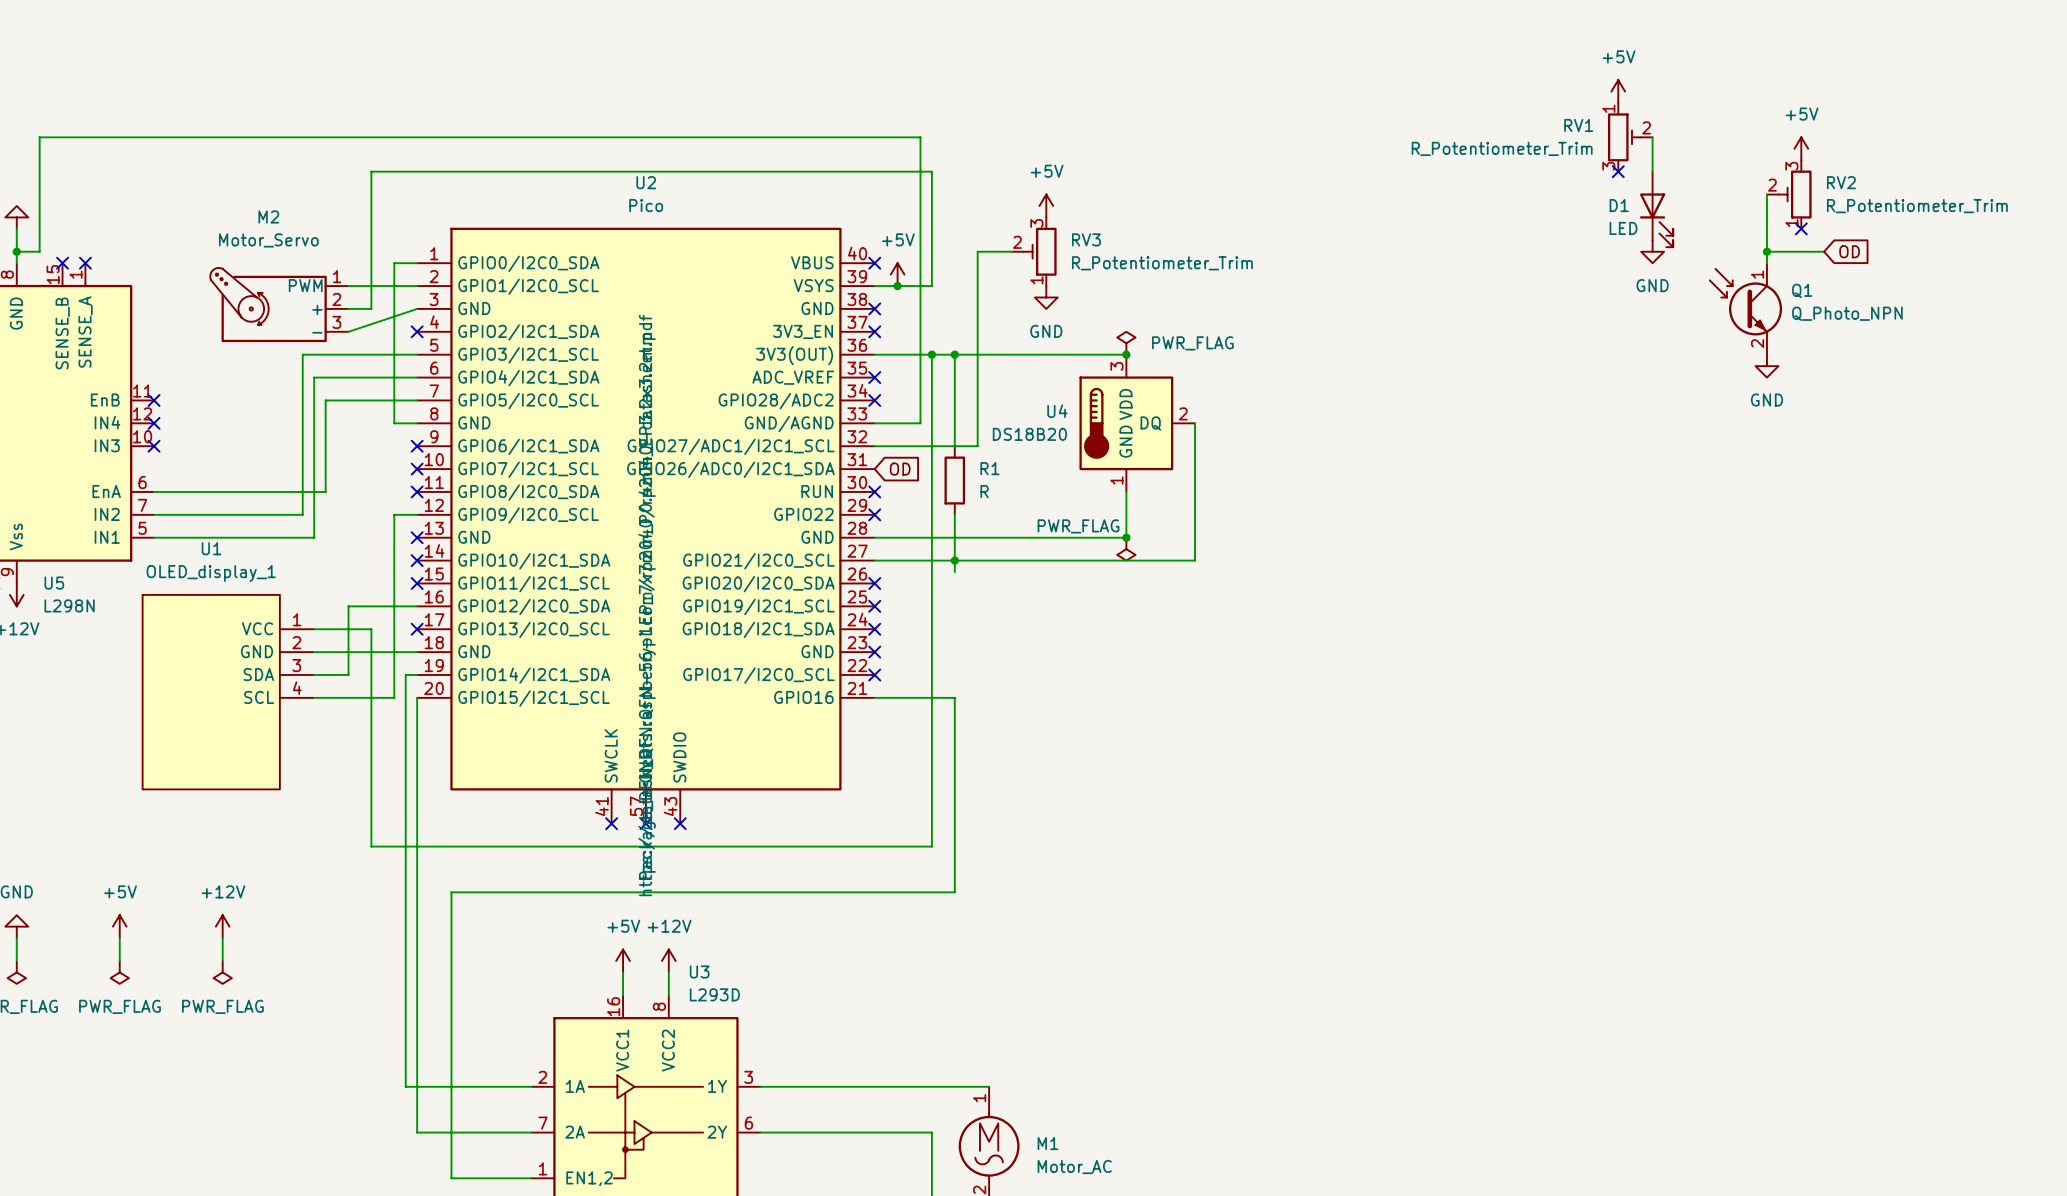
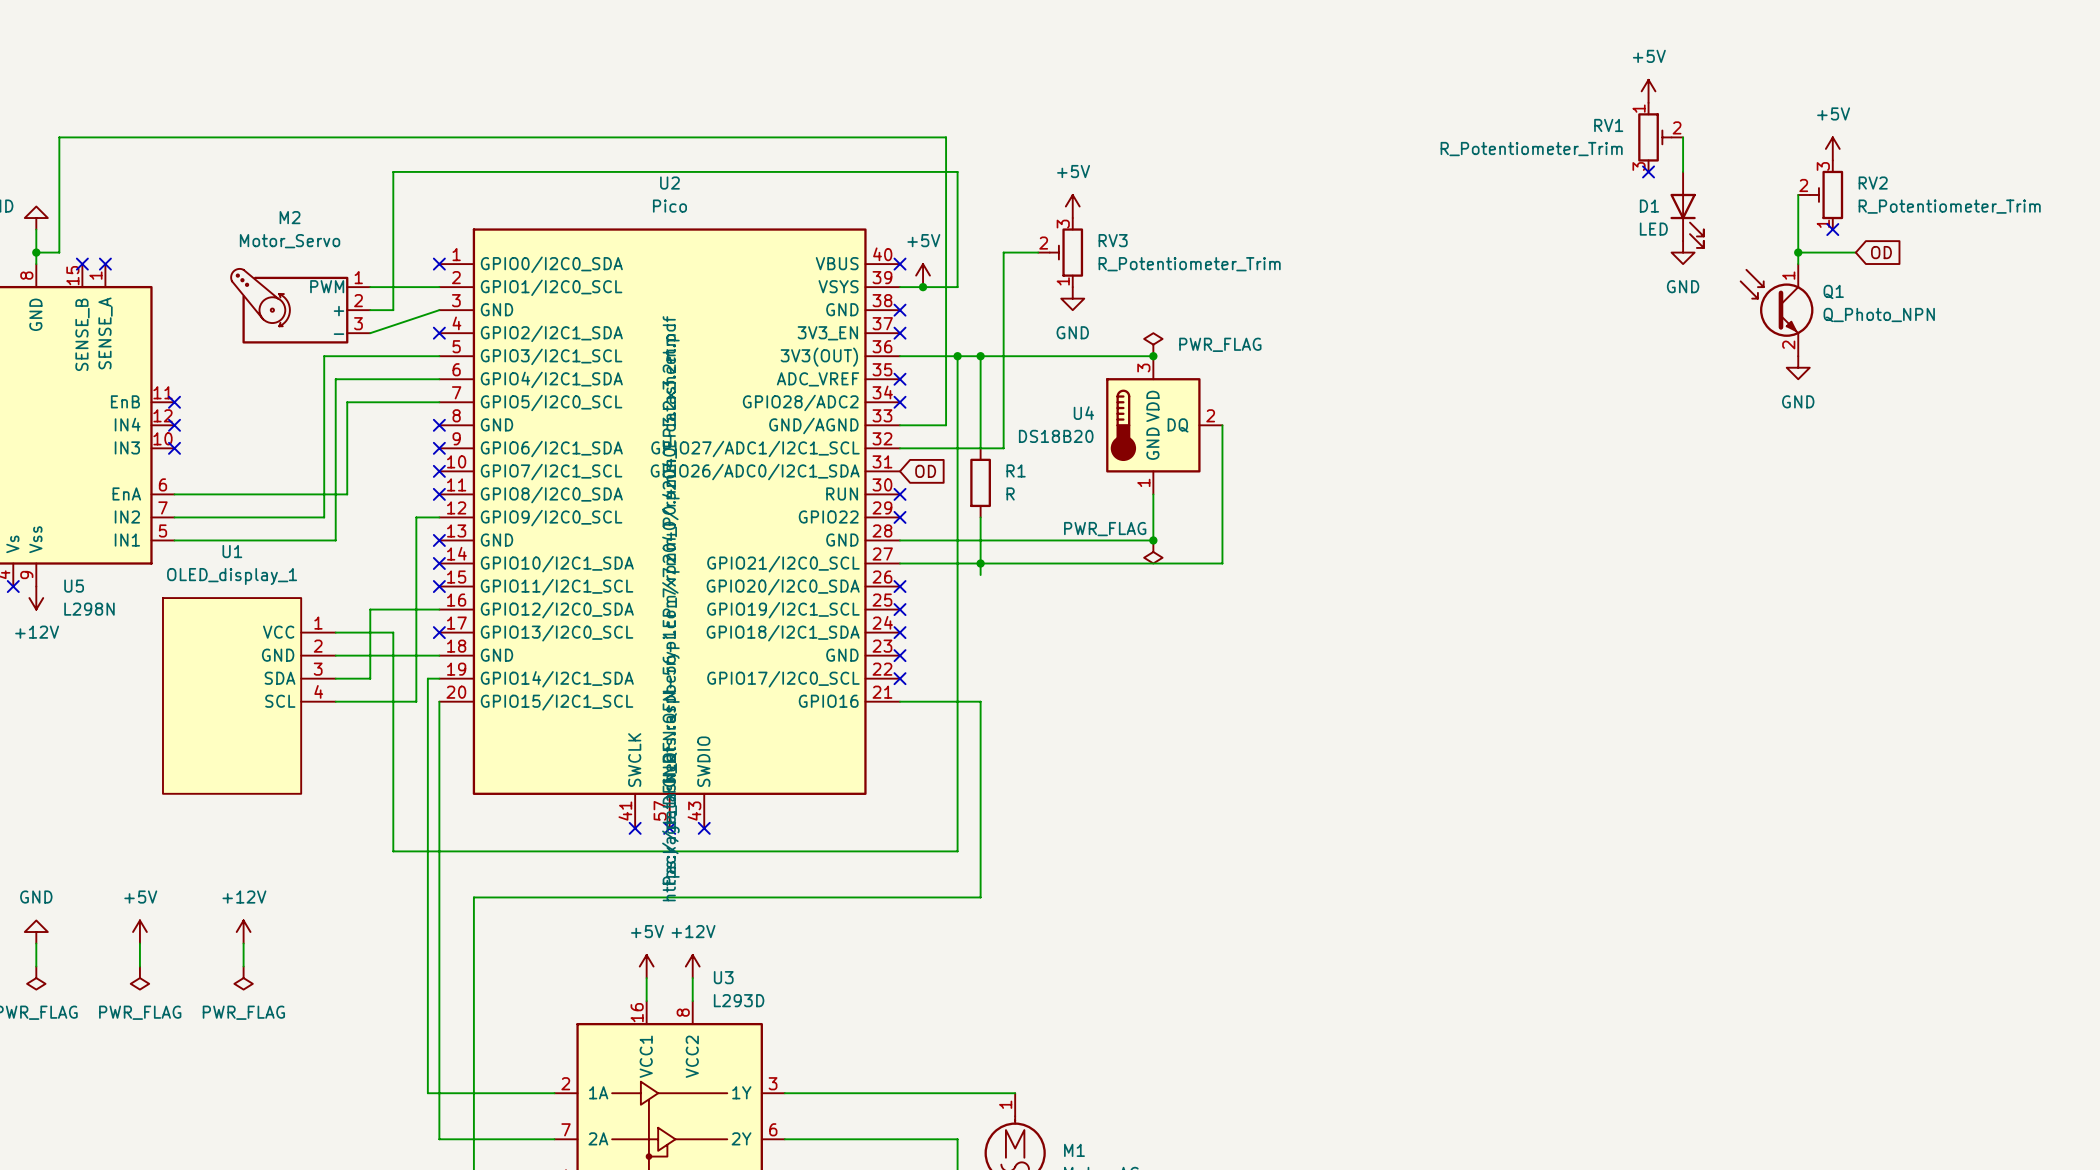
wire: (417, 263) (394, 263) (394, 423) (417, 423) -> none
no-connect mark: none -> (439, 264)
no-connect mark: none -> (439, 425)

